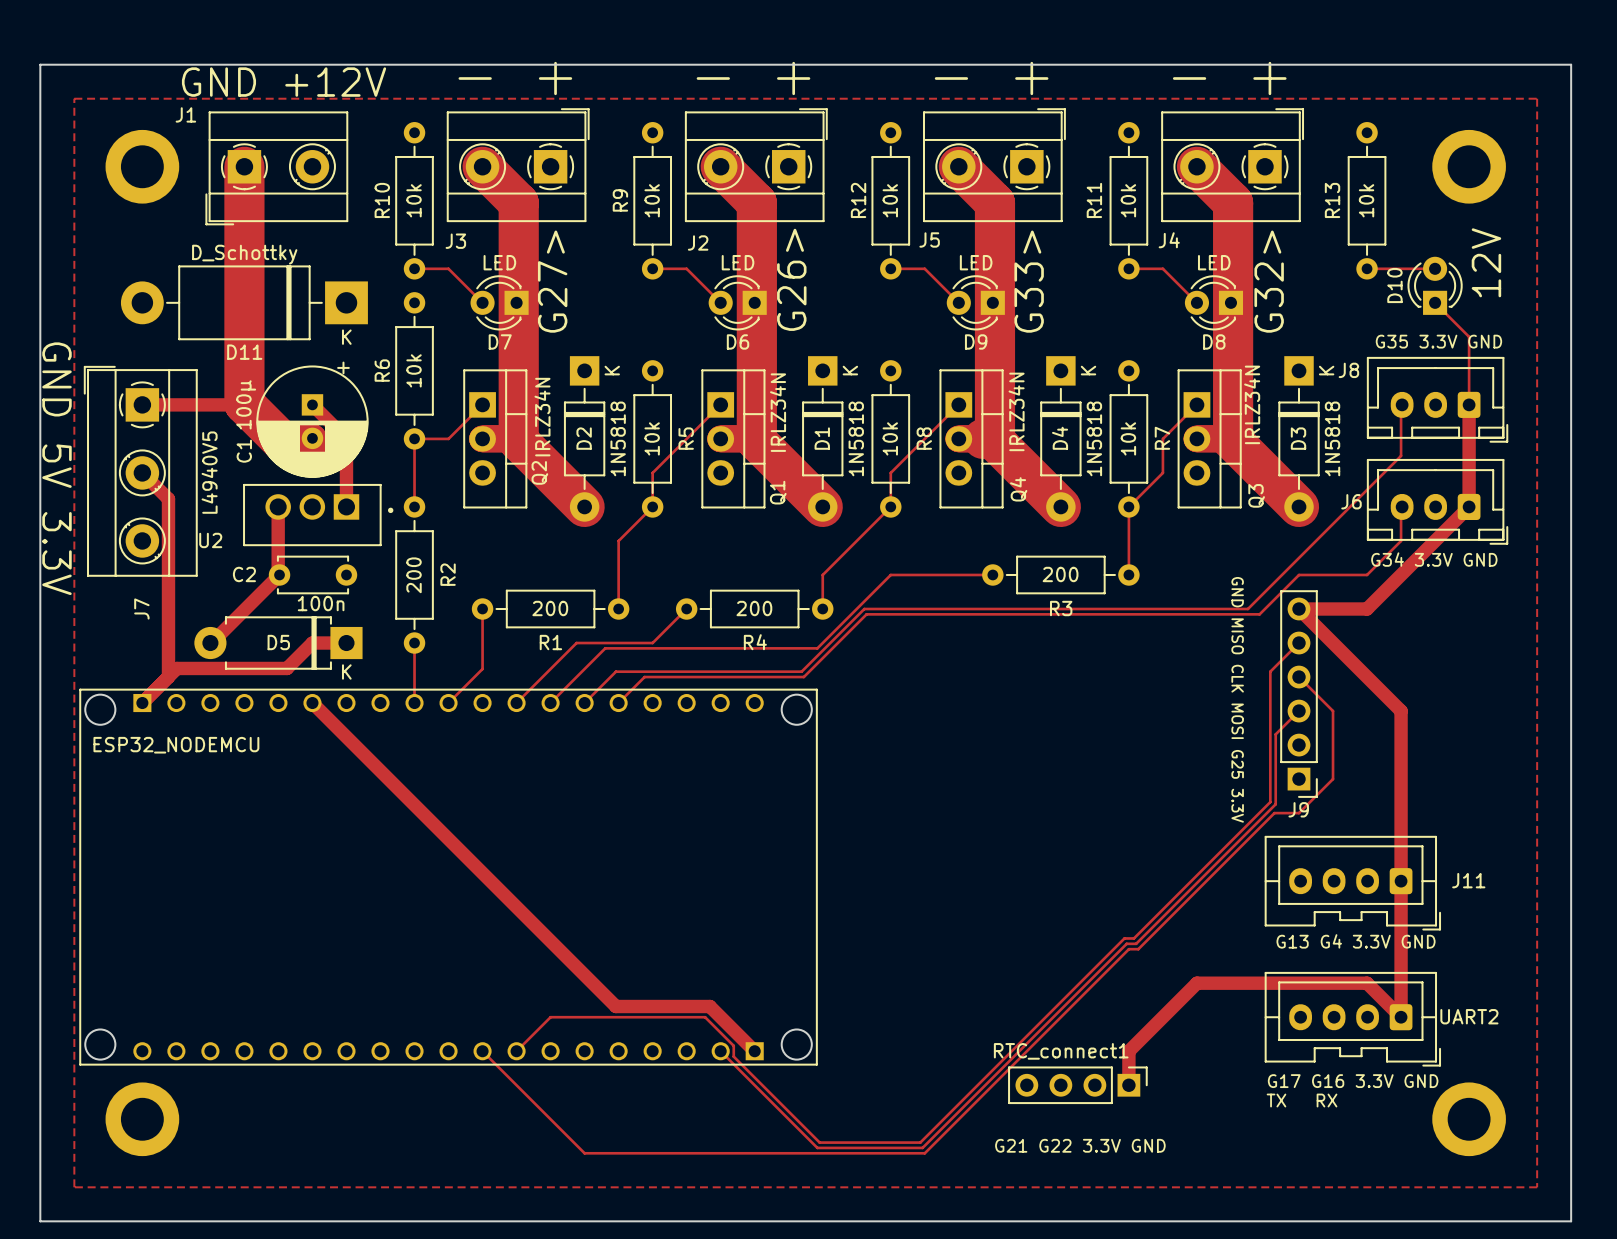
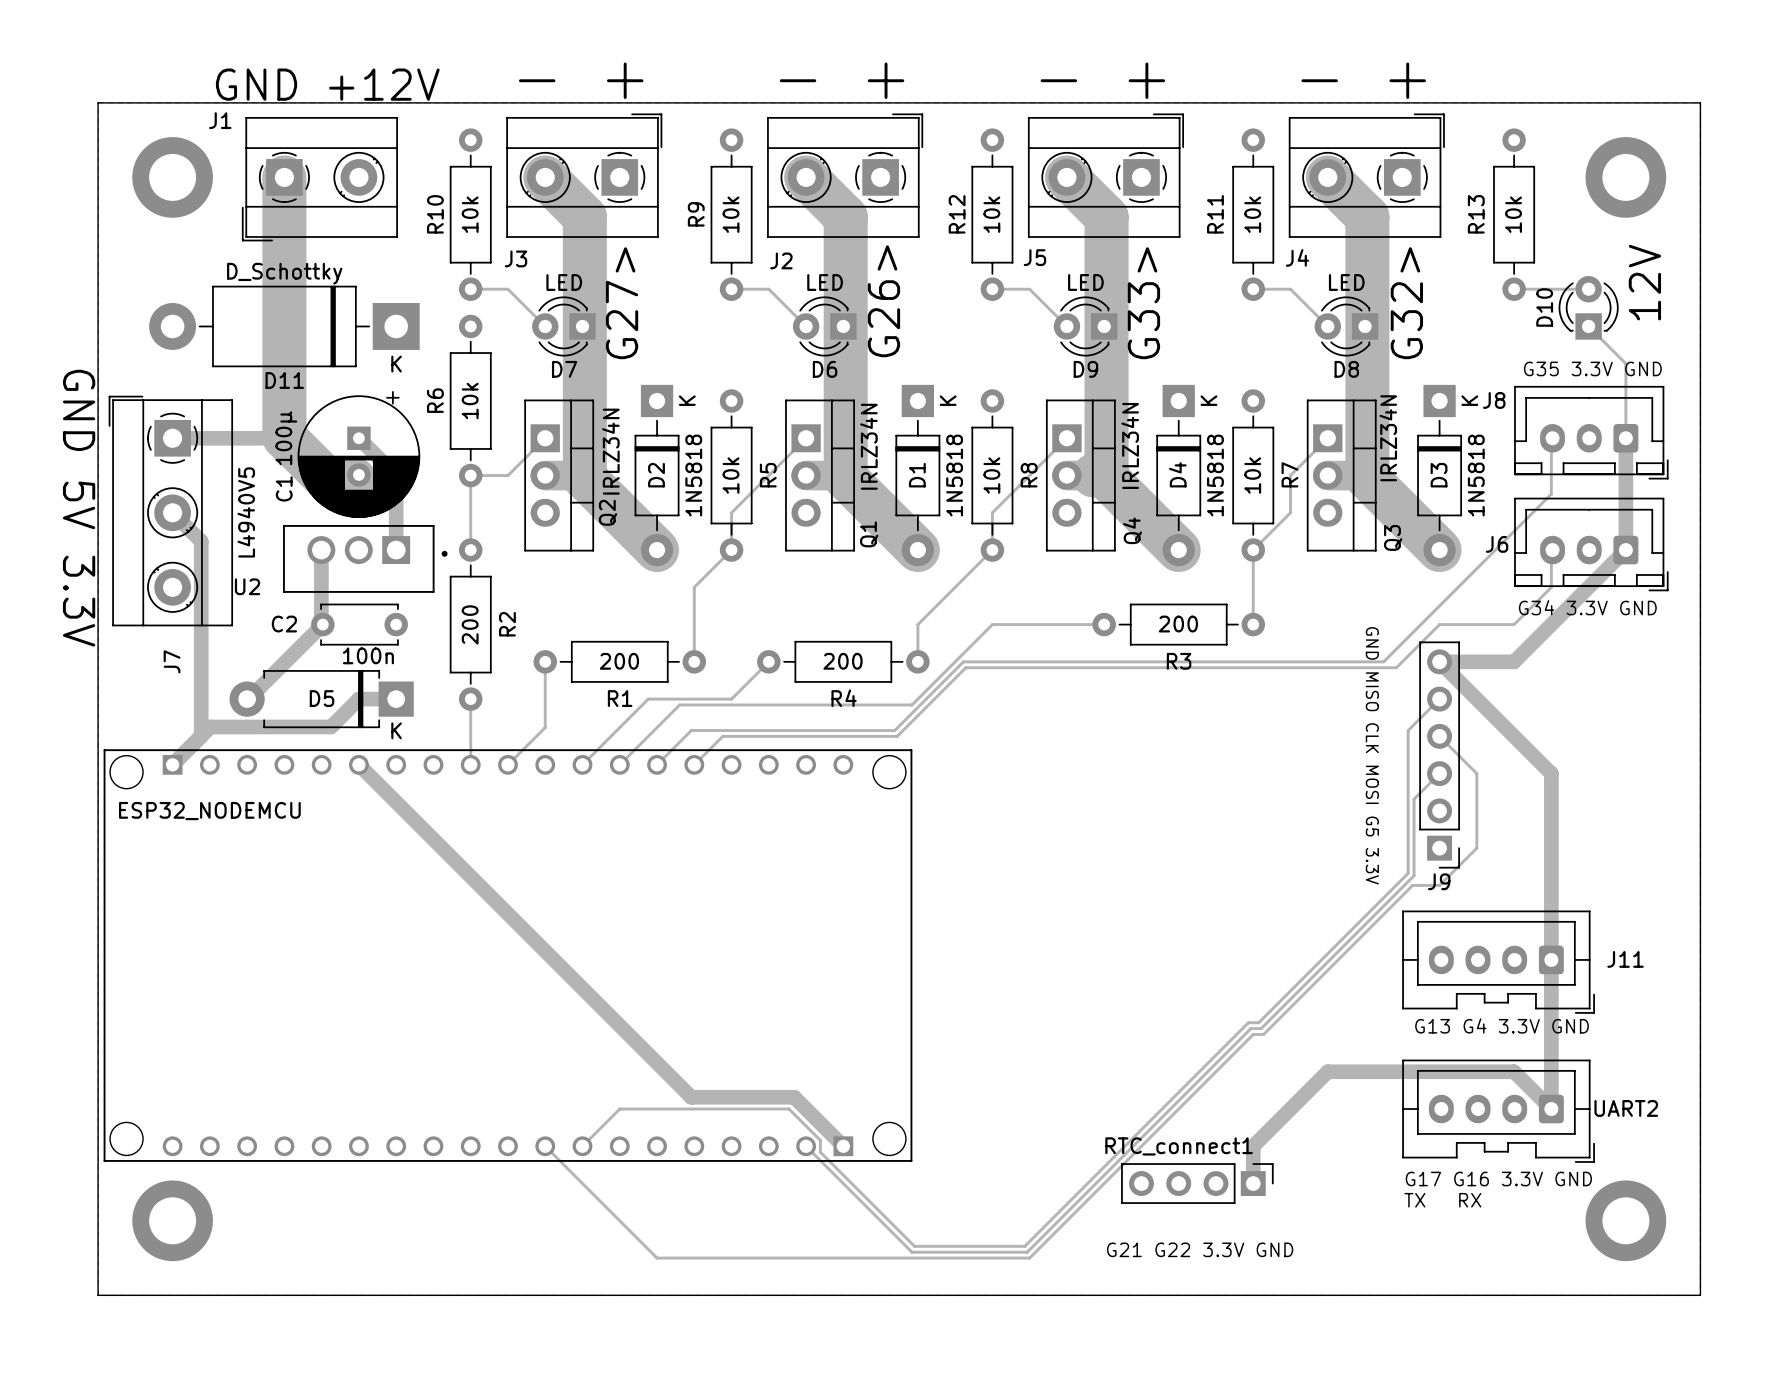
board edge: (40, 64) (1571, 64) (1571, 1221) (40, 1221) (40, 64) -> (98, 102) (98, 1295) (1700, 1295) (1700, 102) (98, 102)
text: GND MISO CLK MOSI G25 3.3V (1237, 699) -> GND MISO CLK MOSI G5 3.3V (1372, 755)

